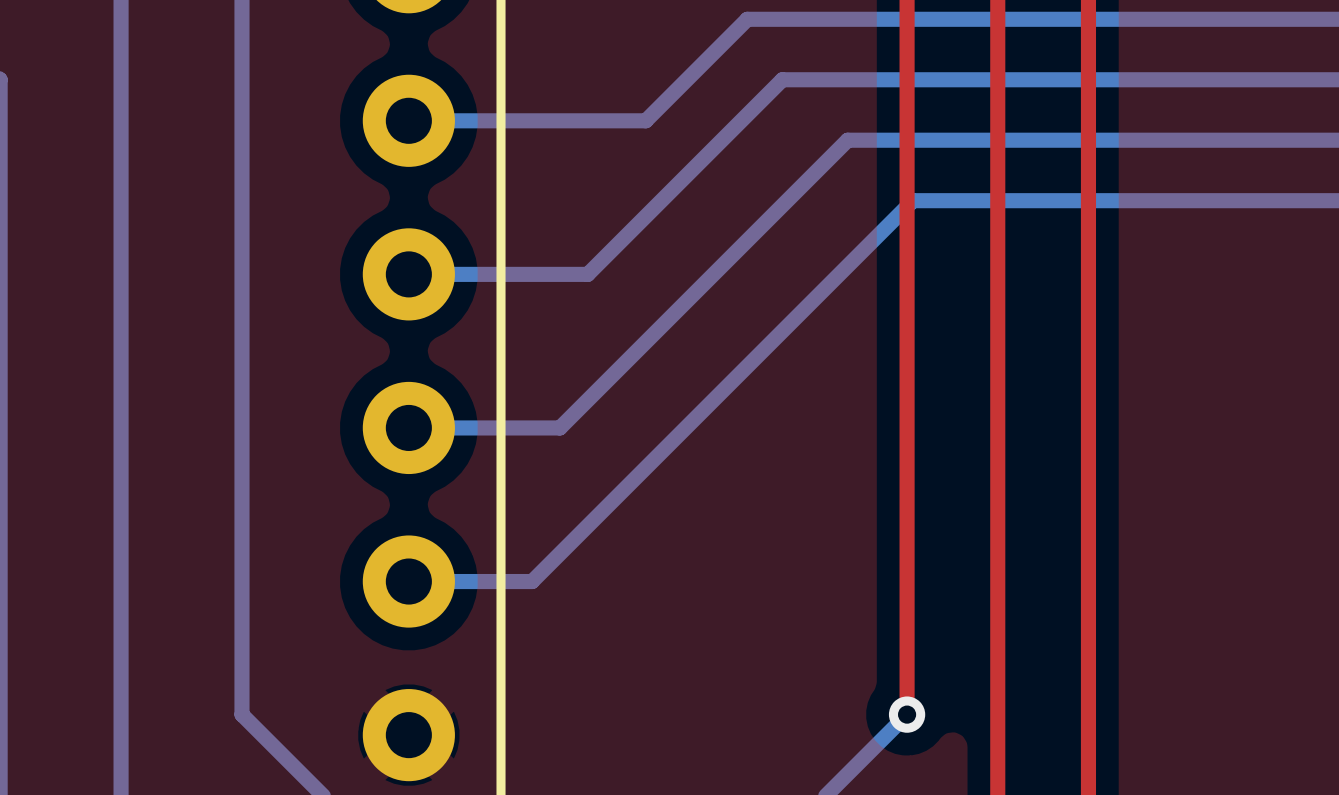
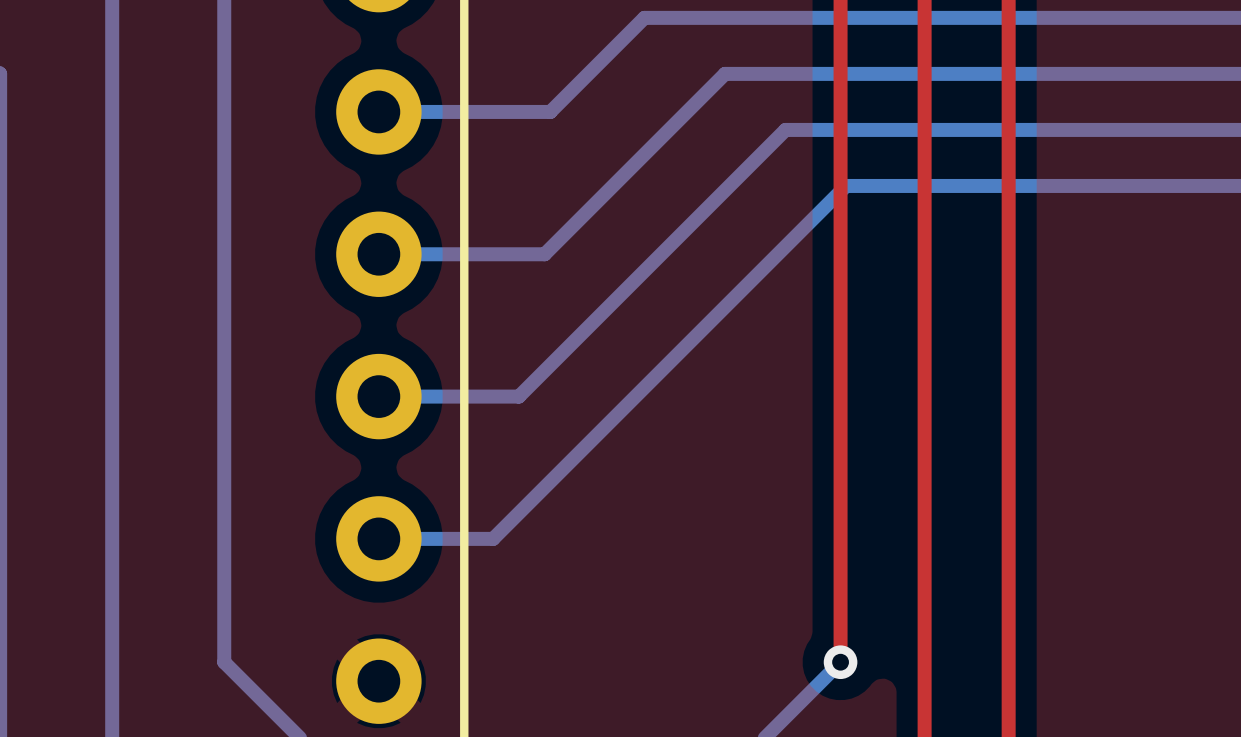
bottom track: (747, 19) (645, 120) (593, 120) -> (692, 17) (644, 17) (550, 111)

